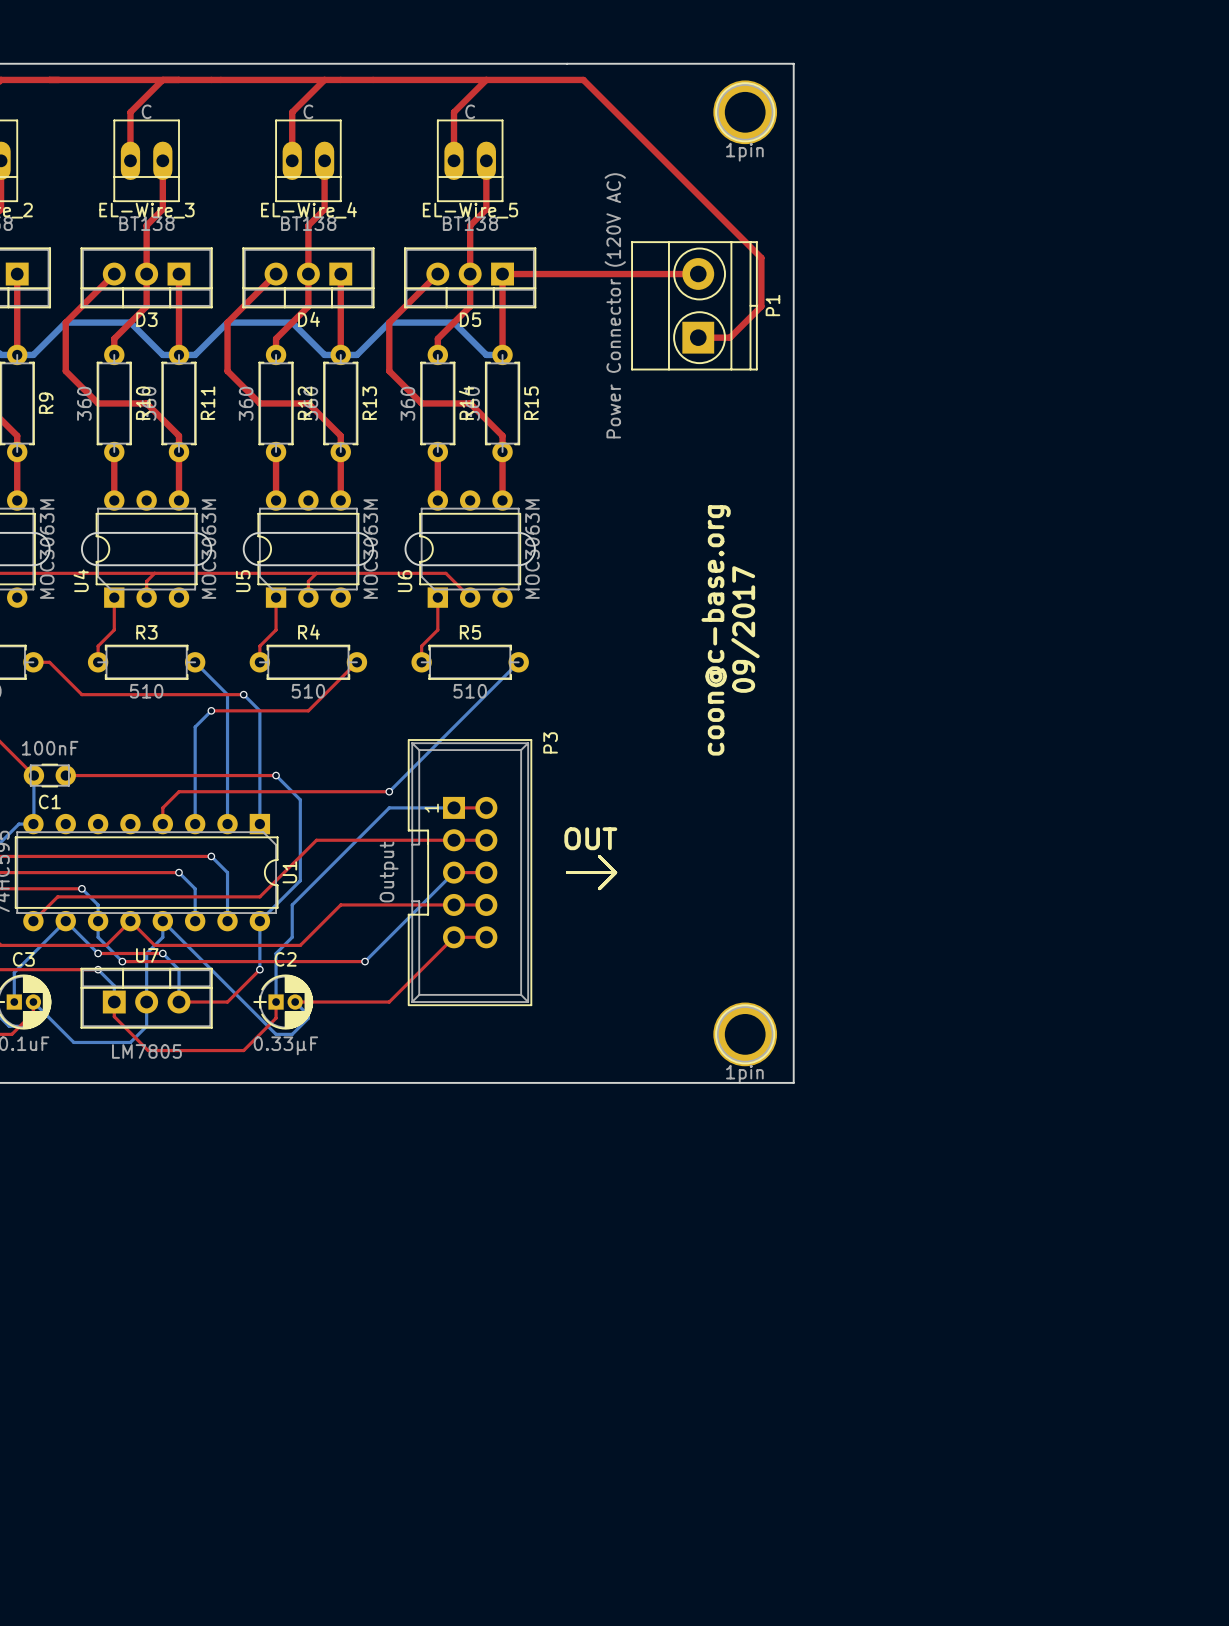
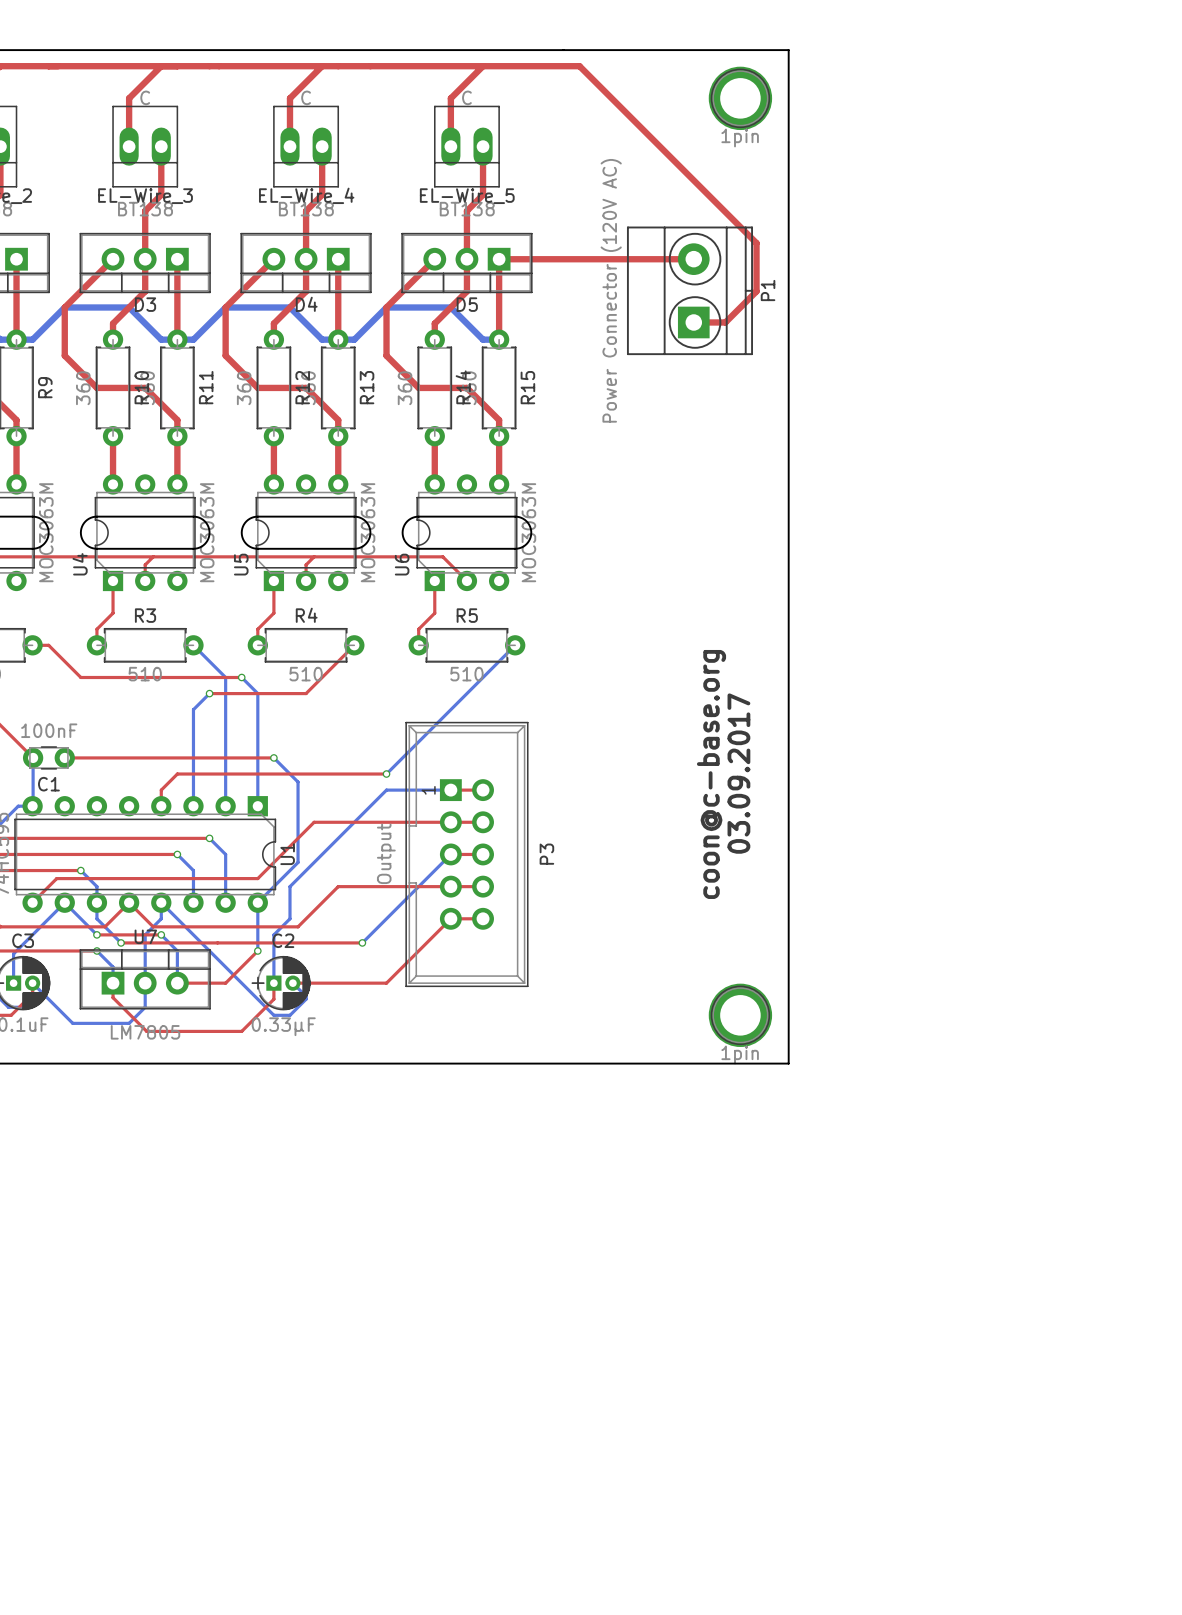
text: 09/2017 (745, 629) -> 03.09.2017 (738, 773)
text position: coon@c-base.org (716, 630) -> coon@c-base.org (711, 774)
P3 footprint: [407, 739, 533, 1007] -> [405, 721, 529, 988]
P3 name position: P3 (550, 742) -> P3 (546, 854)
text: OUT (590, 838) -> none
line: (599, 856) (615, 872) -> none
line: (567, 872) (615, 872) -> none
line: (615, 872) (599, 888) -> none

